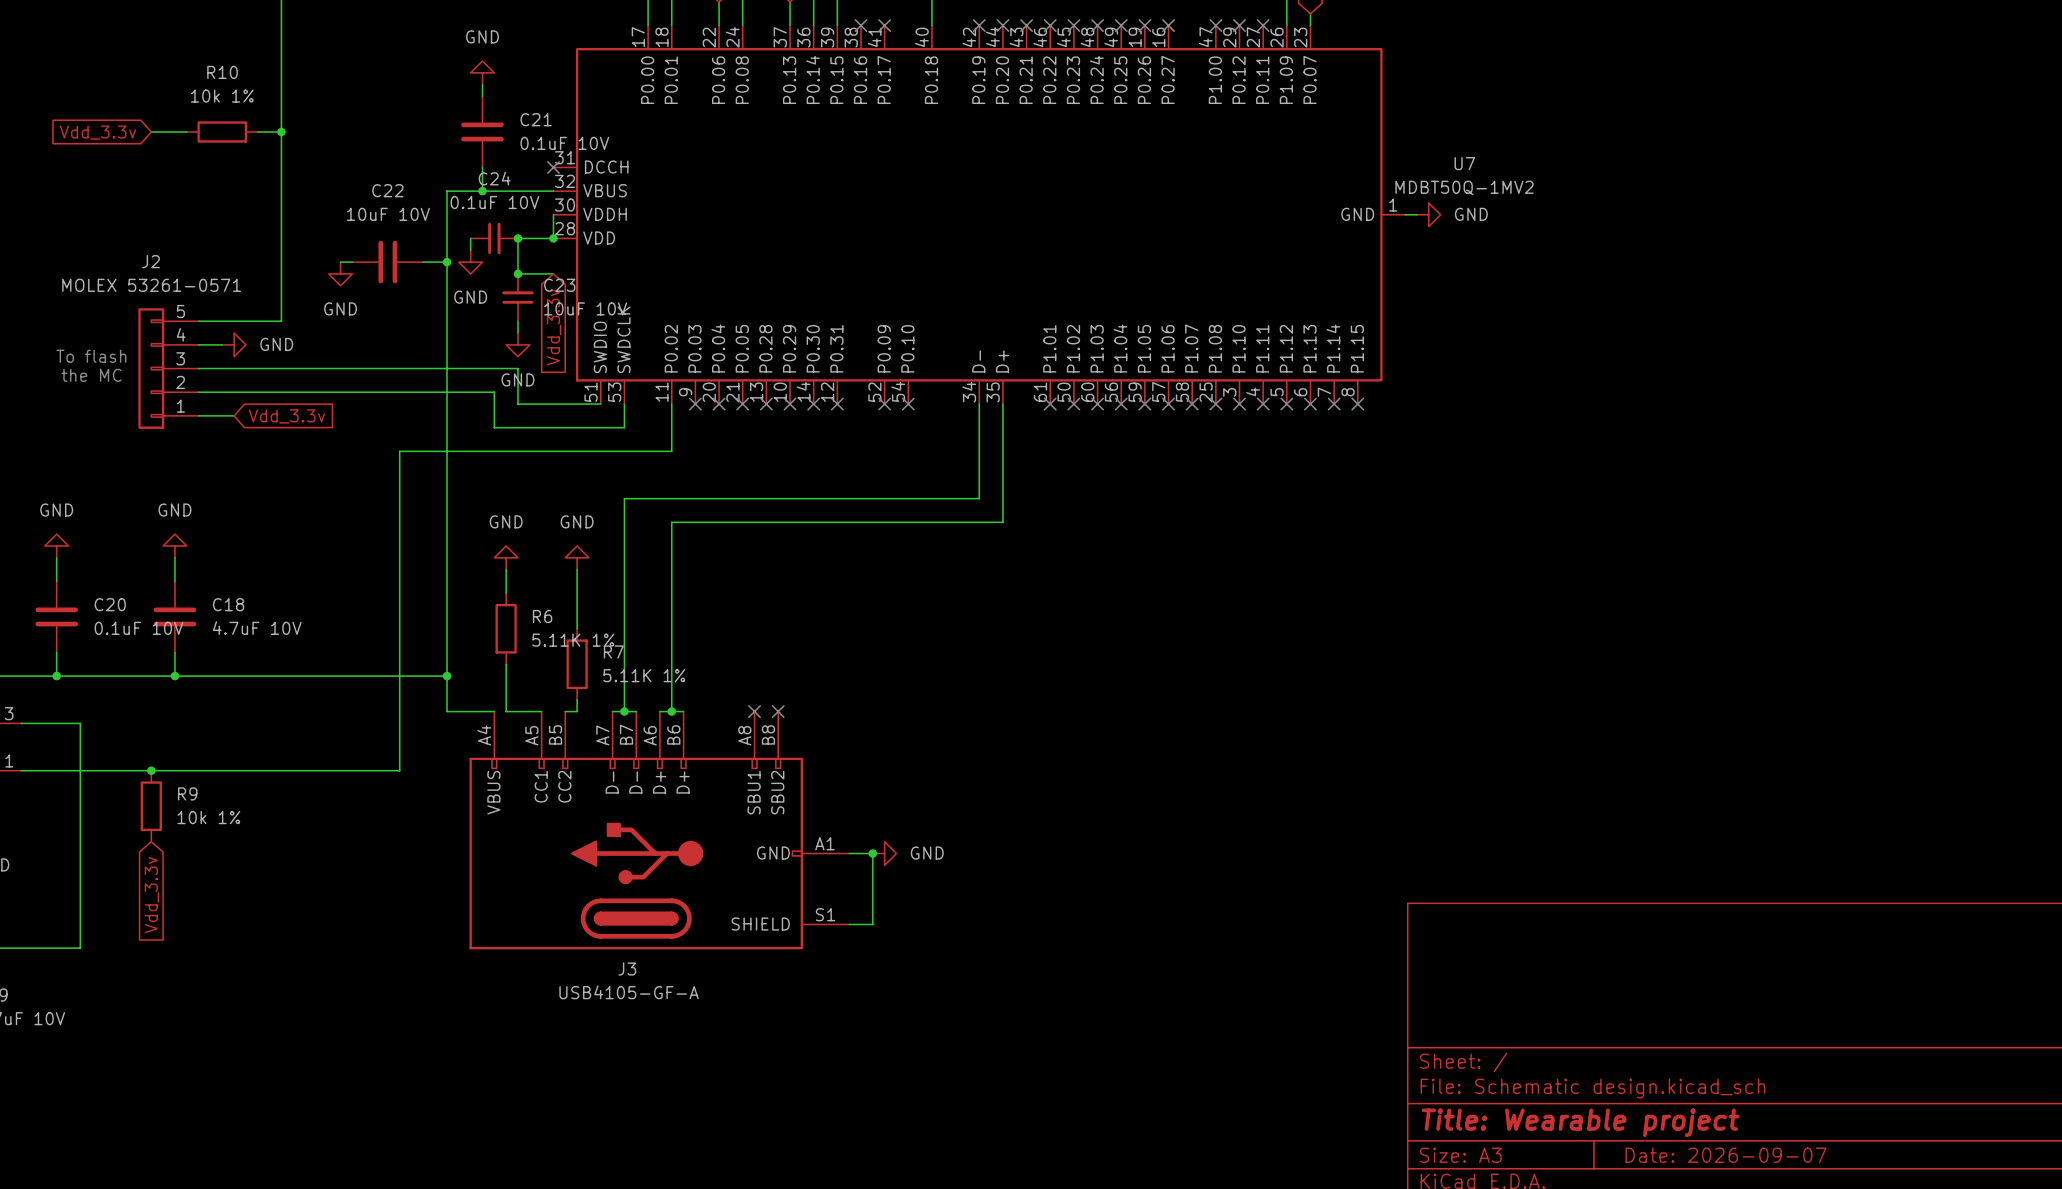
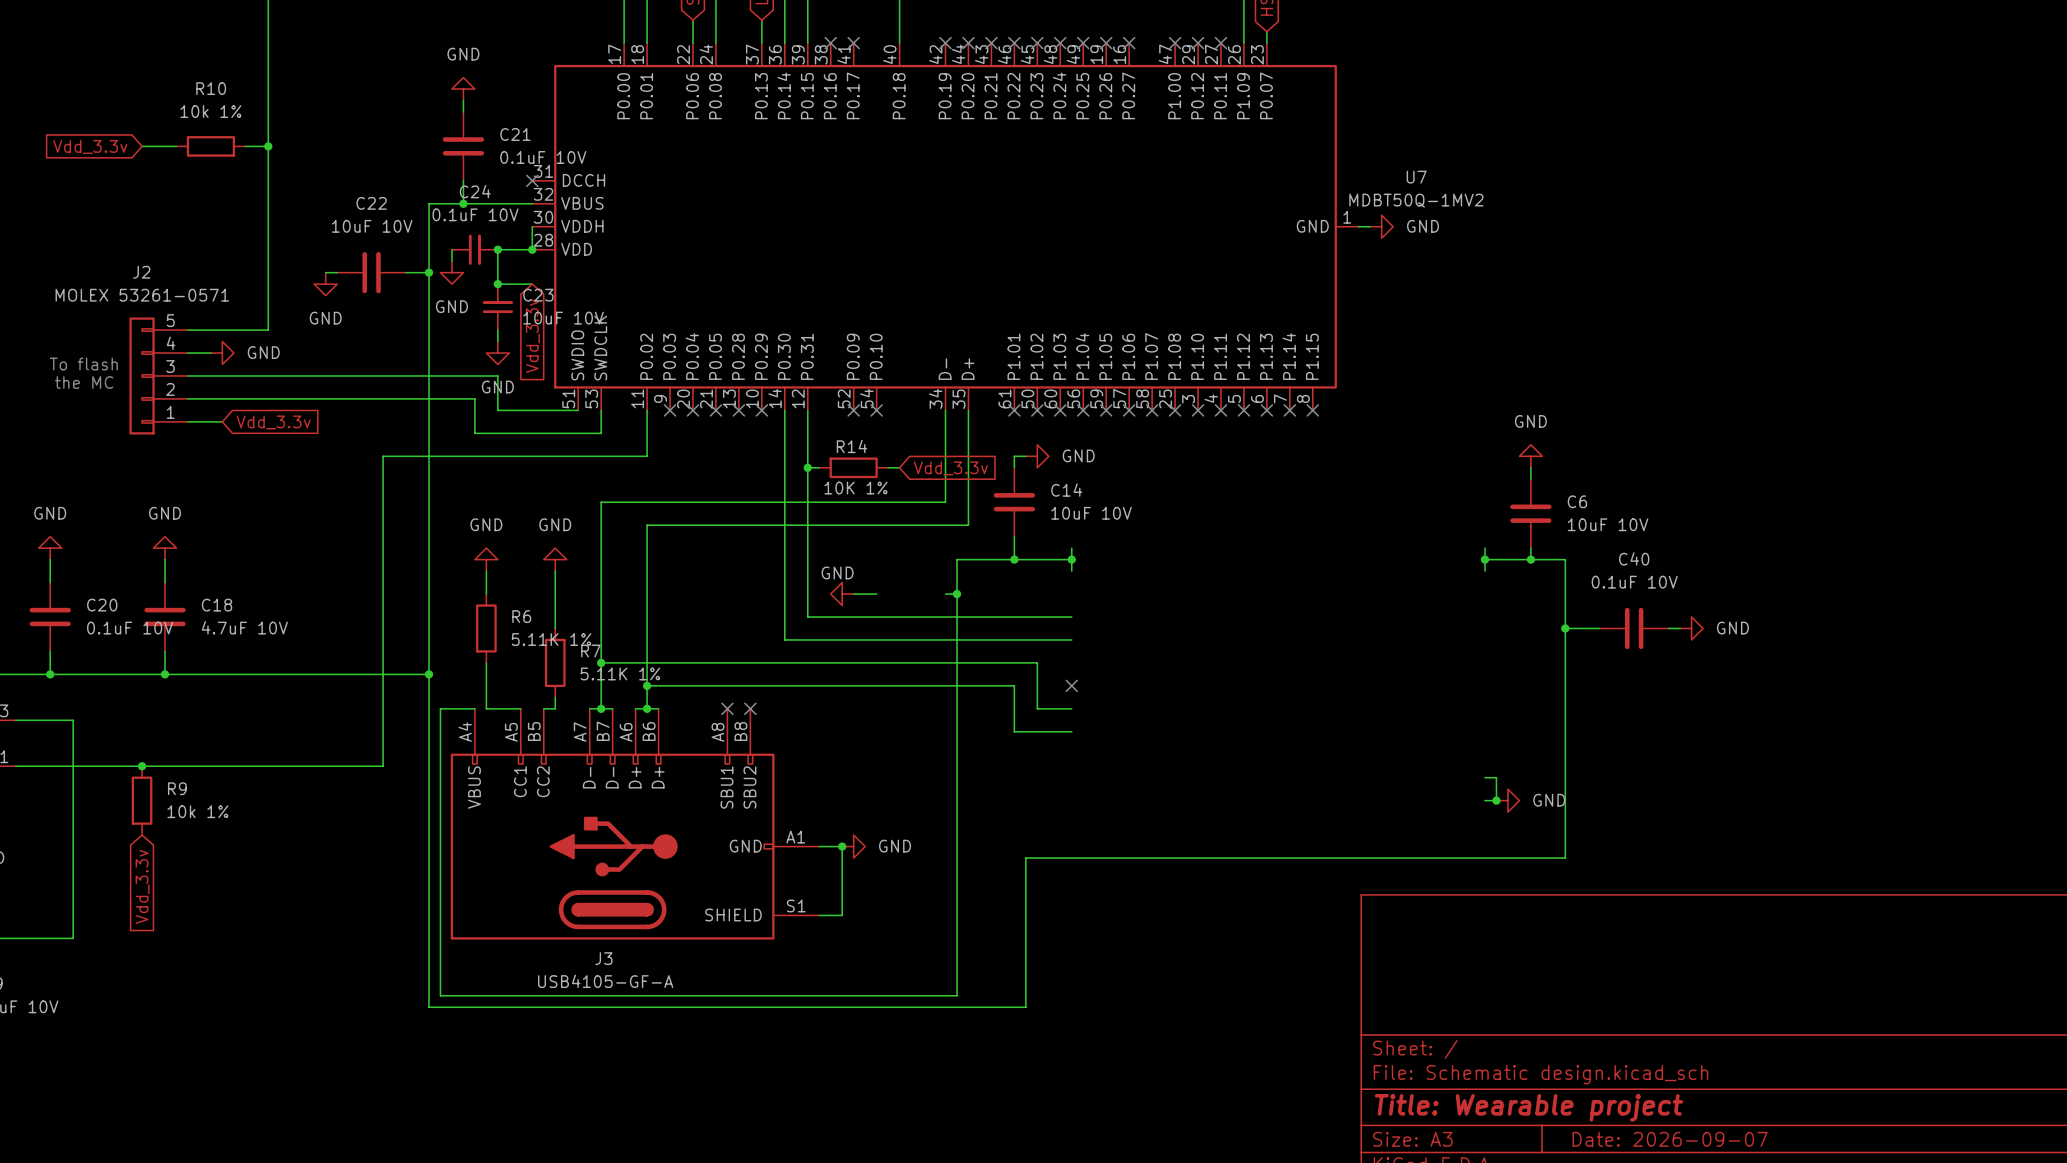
wire: none -> (784, 410) (784, 639) (1071, 639)
no-connect mark: (813, 404) -> none
wire: none -> (807, 410) (807, 617) (1071, 617)
no-connect mark: (837, 404) -> none
wire: none -> (1025, 456) (1014, 456) (1014, 467)
power symbol: none -> GND (1037, 456)
power symbol: none -> GND (1530, 456)
wire: none -> (807, 467) (819, 467)
junction: none -> (807, 467)
R14: none -> 10K 1% (853, 467)
wire: none -> (888, 467) (899, 467)
global label: none -> Vdd_3.3v (950, 468)
wire: none -> (1530, 467) (1530, 479)
C14: none -> 10uF 10V (1014, 502)
C6: none -> 10uF 10V (1530, 513)
wire: none -> (1014, 536) (1014, 559)
wire: none -> (1071, 548) (1071, 571)
wire: none -> (1484, 548) (1484, 571)
wire: none -> (1530, 548) (1530, 559)
junction: none -> (1014, 559)
junction: none -> (1071, 559)
wire: none -> (1484, 559) (1565, 559) (1565, 858) (1025, 858) (1025, 1007) (429, 1007) (429, 708)
junction: none -> (1484, 559)
junction: none -> (1530, 559)
power symbol: none -> GND (842, 594)
wire: none -> (853, 594) (876, 594)
wire: none -> (945, 594) (956, 594)
junction: none -> (956, 594)
wire: none -> (1565, 628) (1599, 628)
junction: none -> (1565, 628)
C40: none -> 0.1uF 10V (1634, 628)
wire: none -> (1668, 628) (1680, 628)
power symbol: none -> GND (1691, 628)
wire: none -> (601, 662) (1037, 662) (1037, 708) (1071, 708)
junction: none -> (601, 662)
wire: none -> (647, 685) (1014, 685) (1014, 731) (1071, 731)
junction: none -> (647, 685)
no-connect mark: none -> (1071, 685)
wire: (447, 711) (458, 711) -> (1071, 559) (956, 559) (956, 995) (440, 995) (440, 708)
wire: none -> (1484, 777) (1496, 777) (1496, 800) (1484, 800)
junction: none -> (1496, 800)
power symbol: none -> GND (1507, 800)

